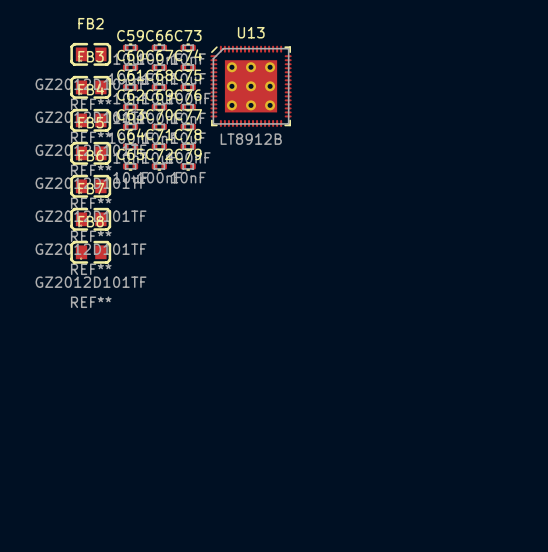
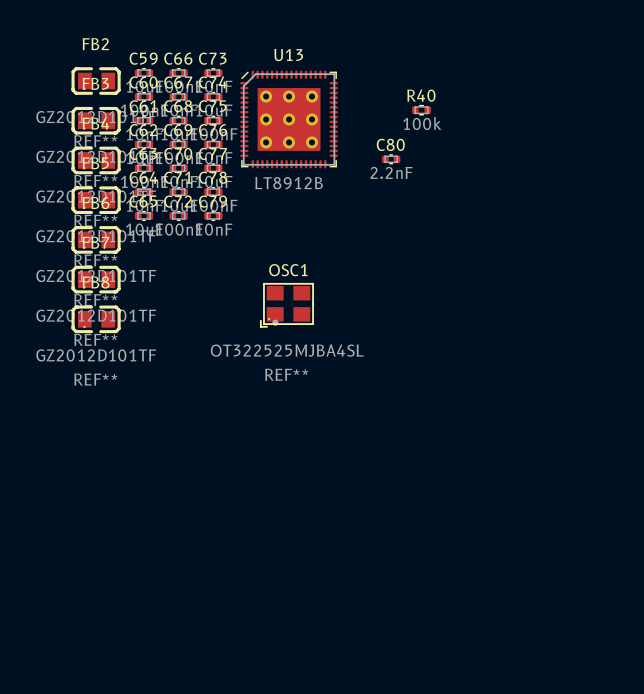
R40: none -> 100k (421, 110)
C80: none -> 2.2nF (391, 159)
OSC1: none -> OT322525MJBA4SL (286, 305)

